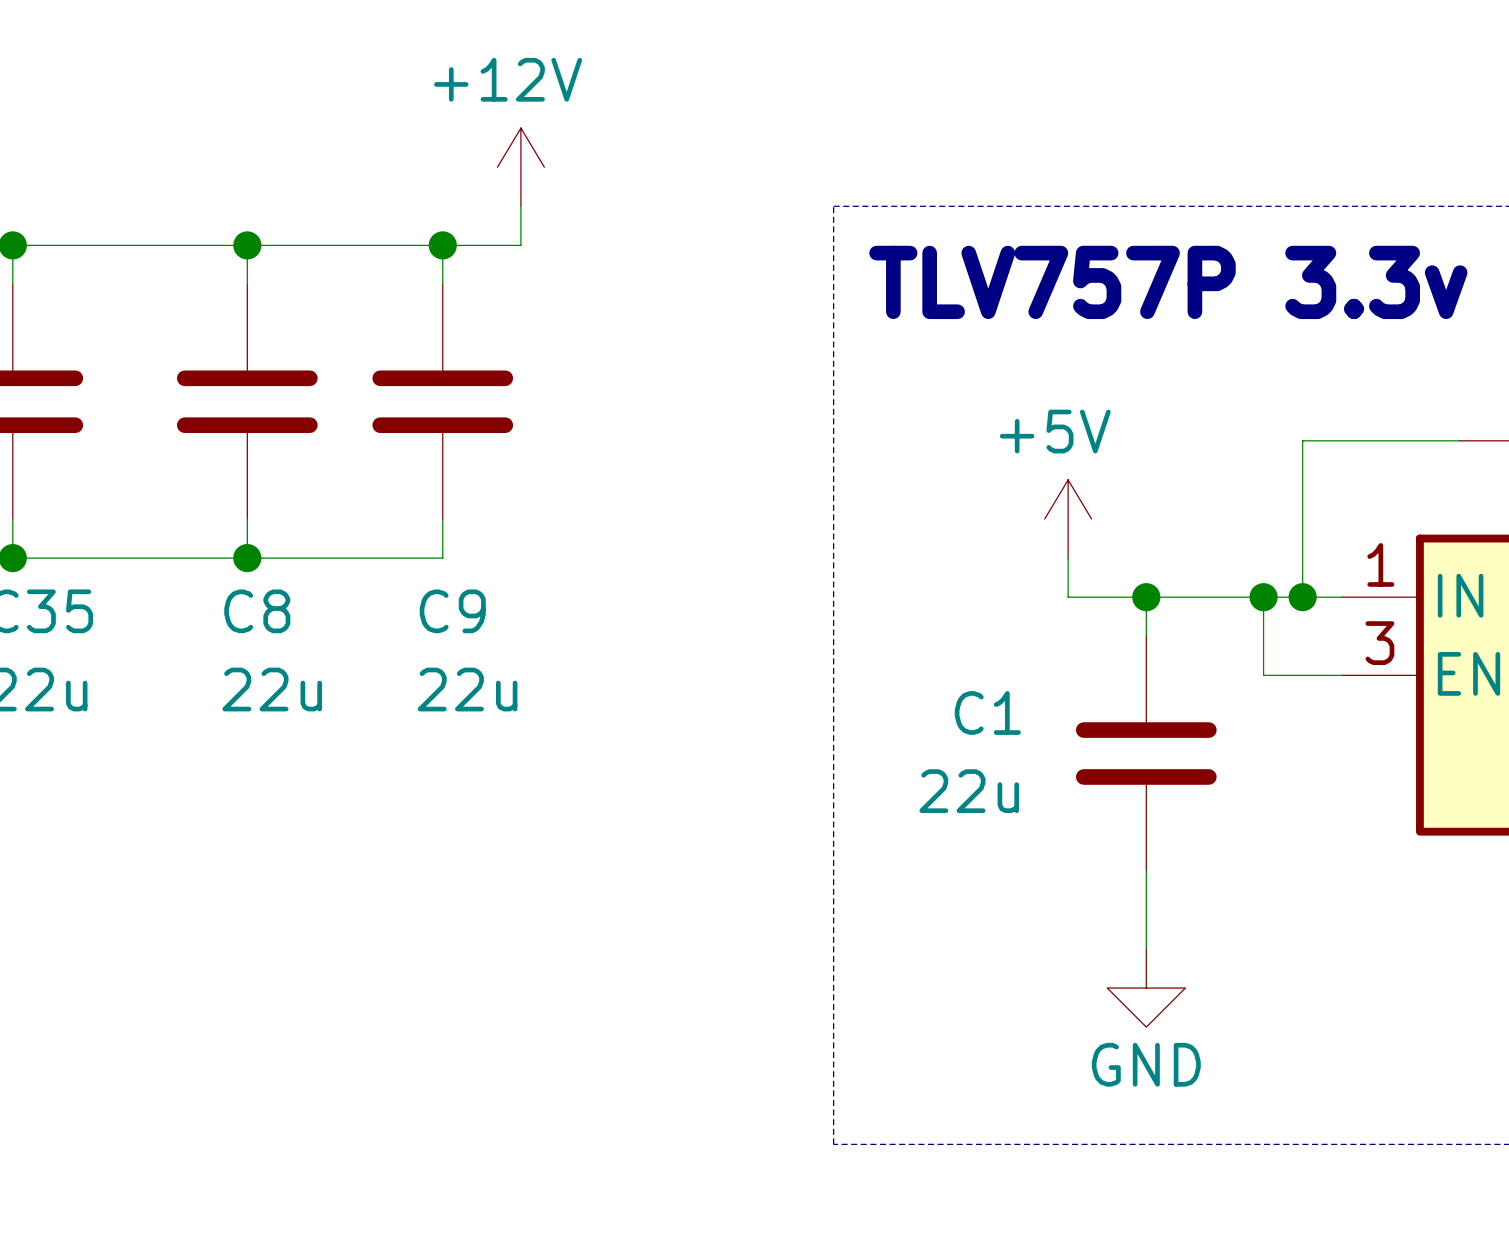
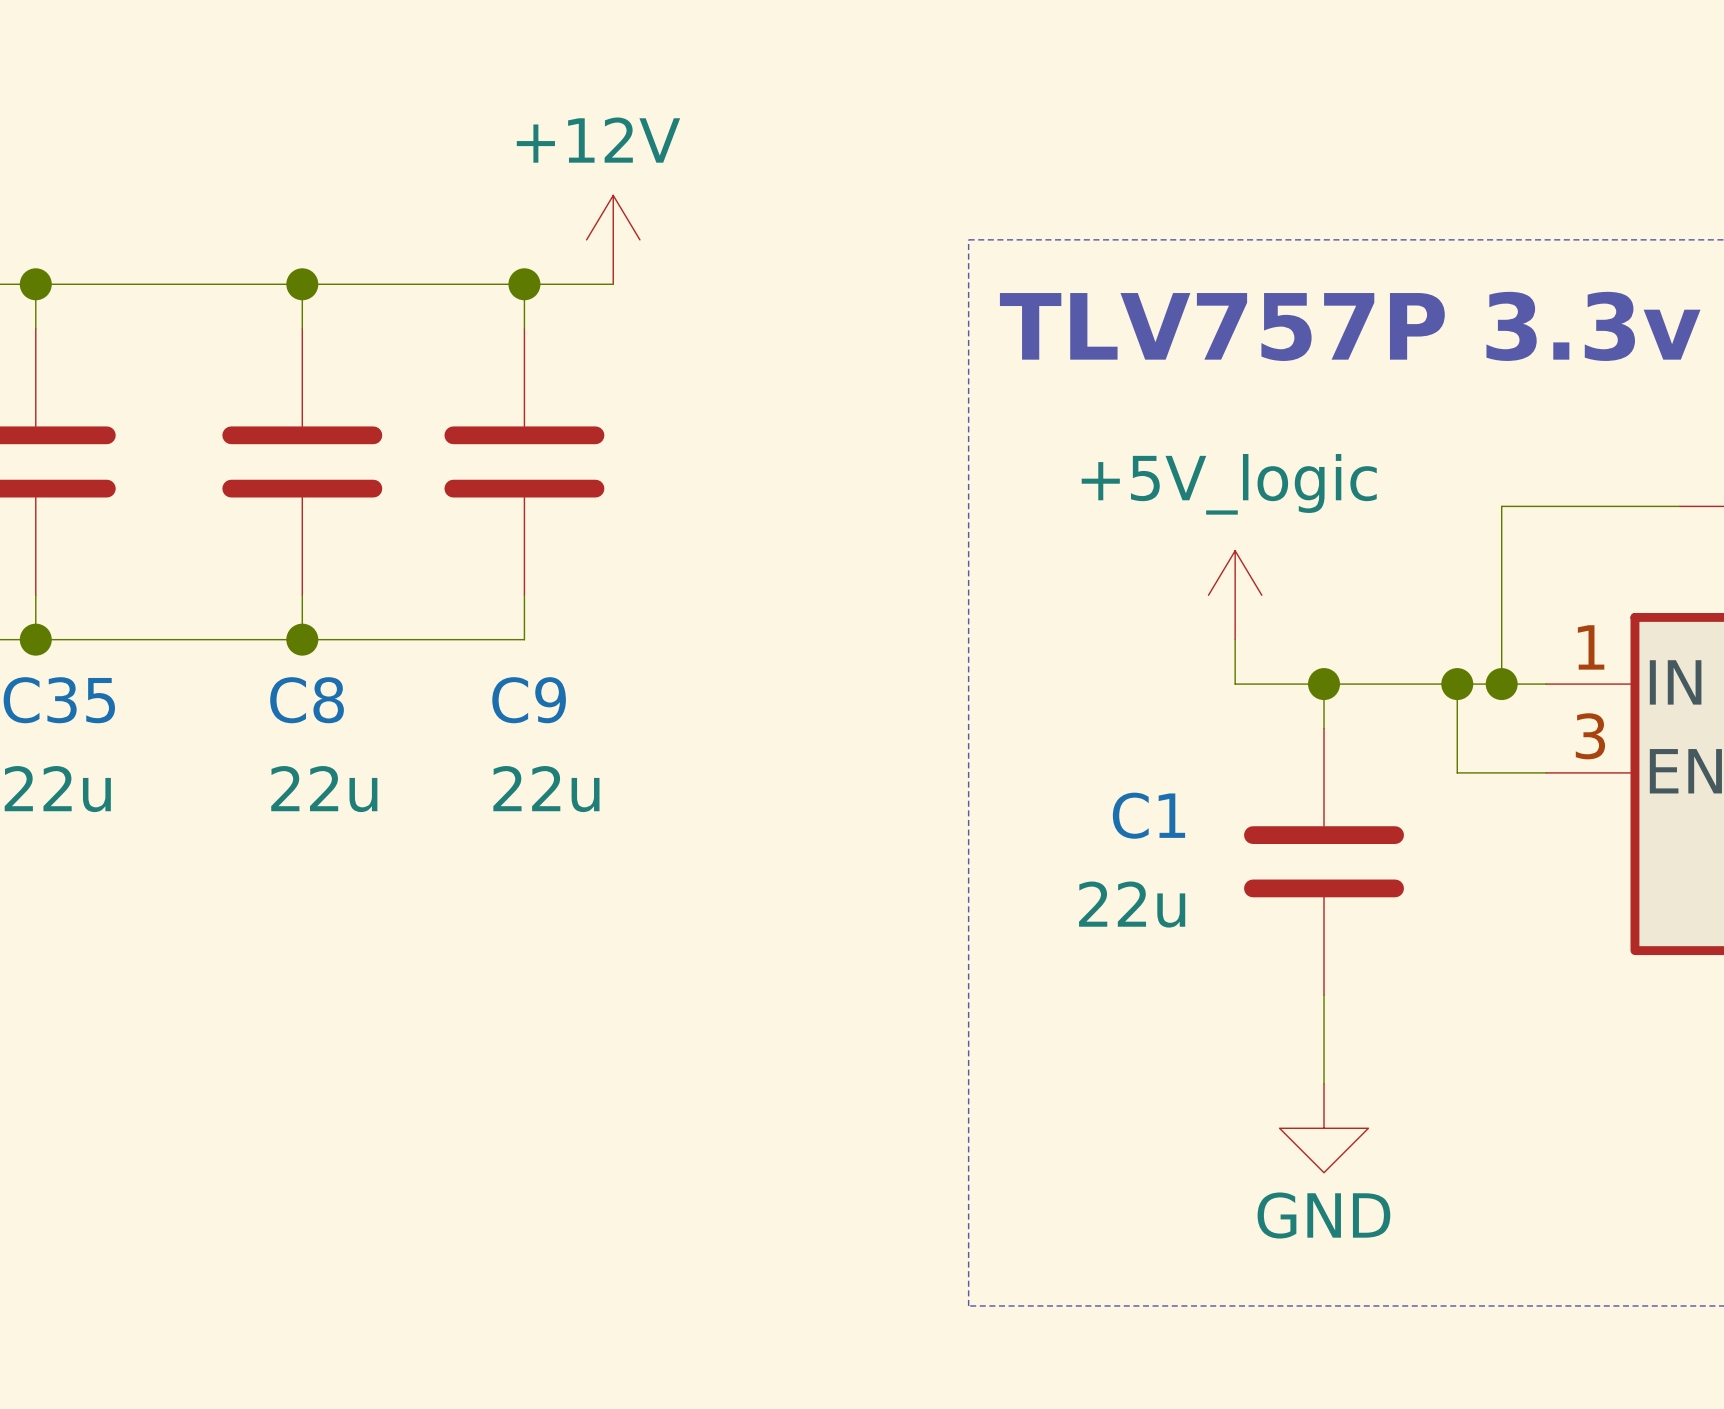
power symbol position: +12V (520, 167) -> +12V (613, 239)
power symbol: +5V (1068, 519) -> +5V_logic (1235, 595)

